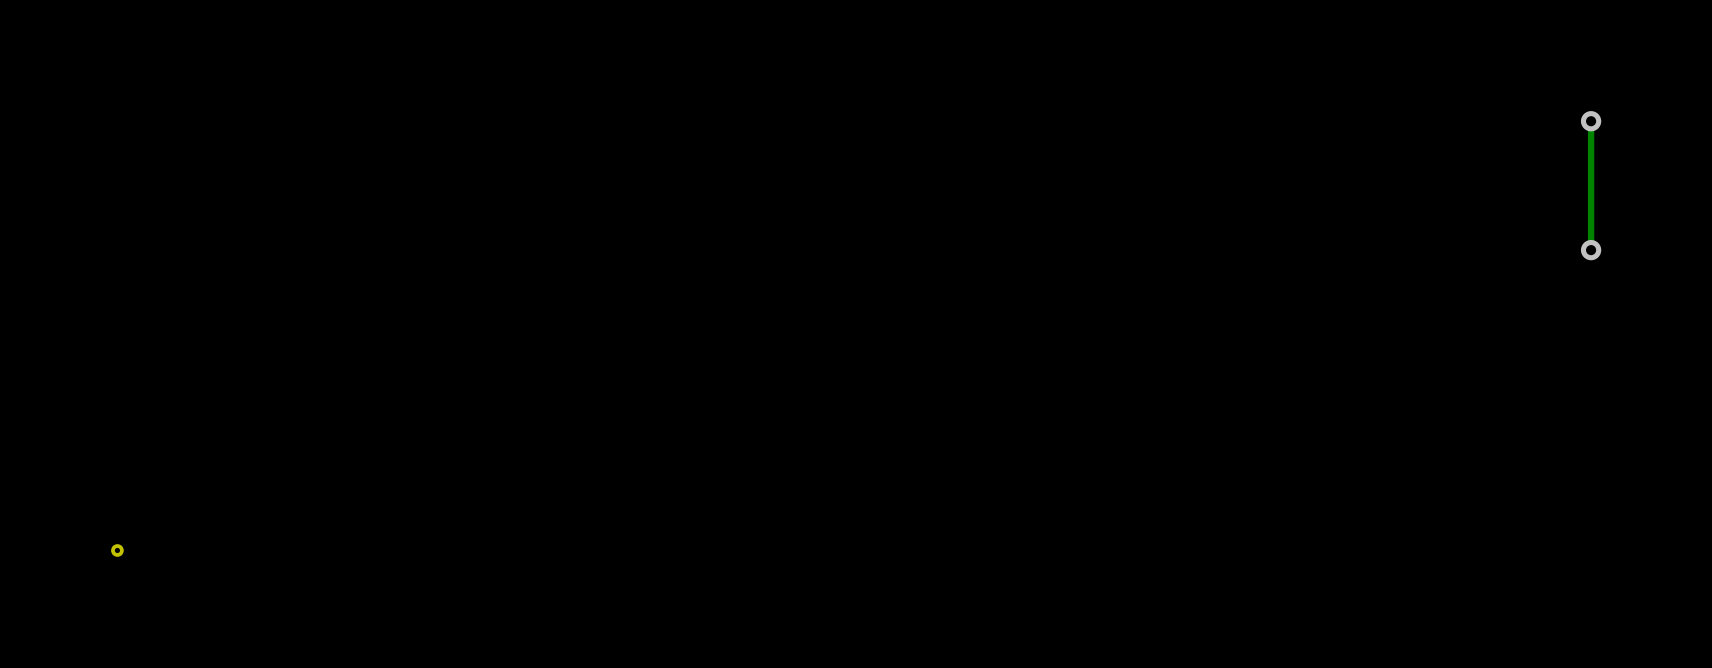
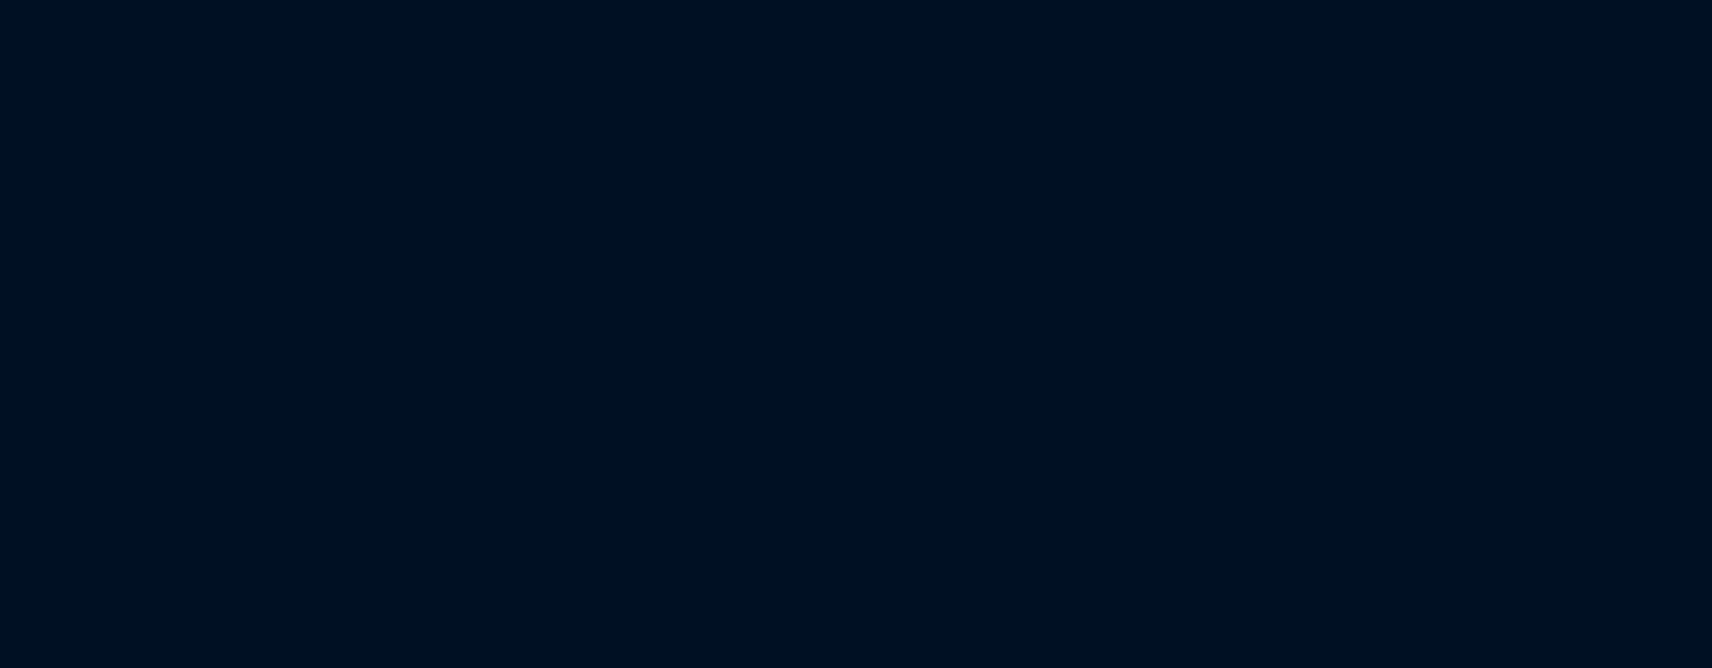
track: (1591, 121) (1591, 250) -> none
via: (1591, 121) -> none
via: (1591, 250) -> none
part: (117, 550) -> none

